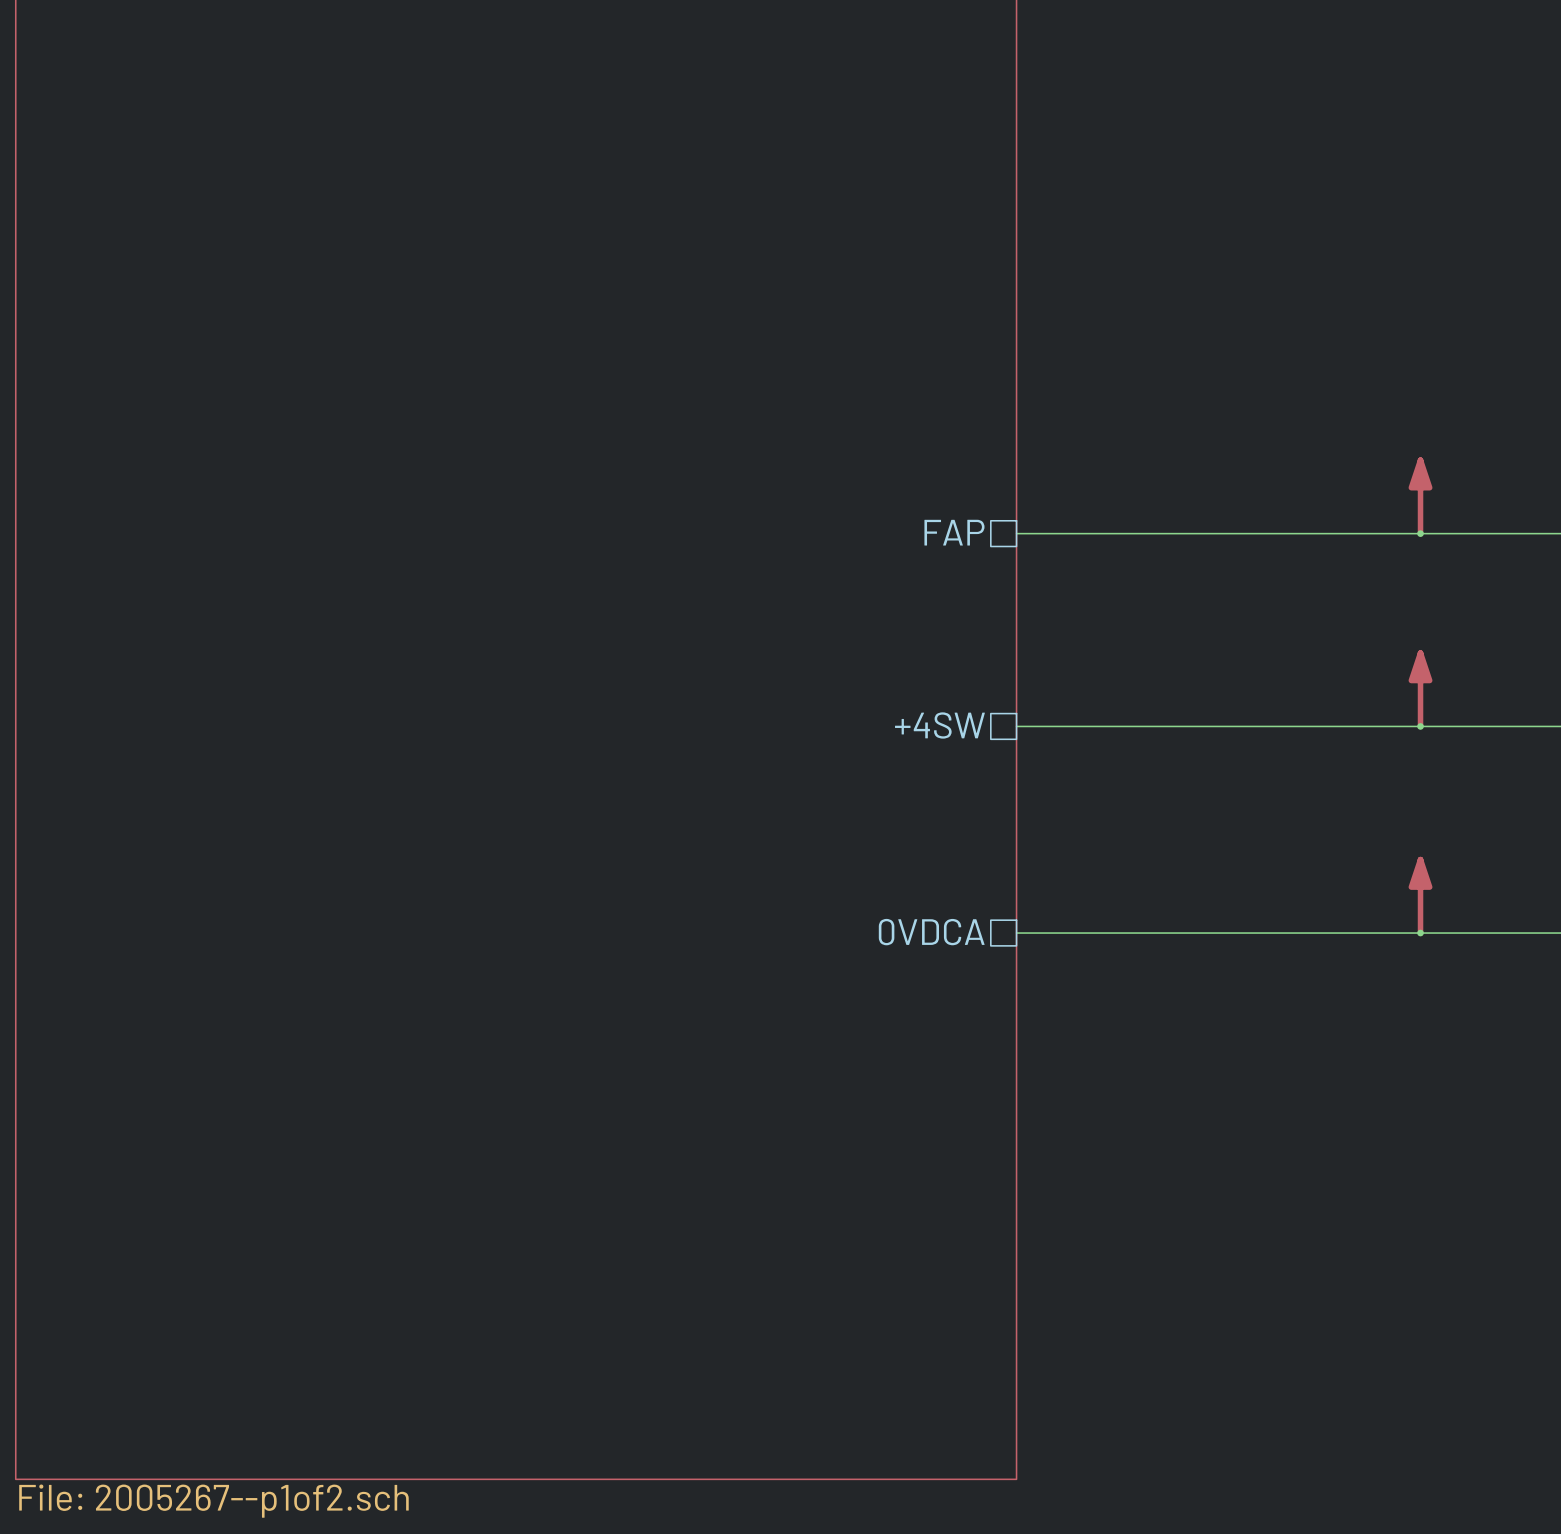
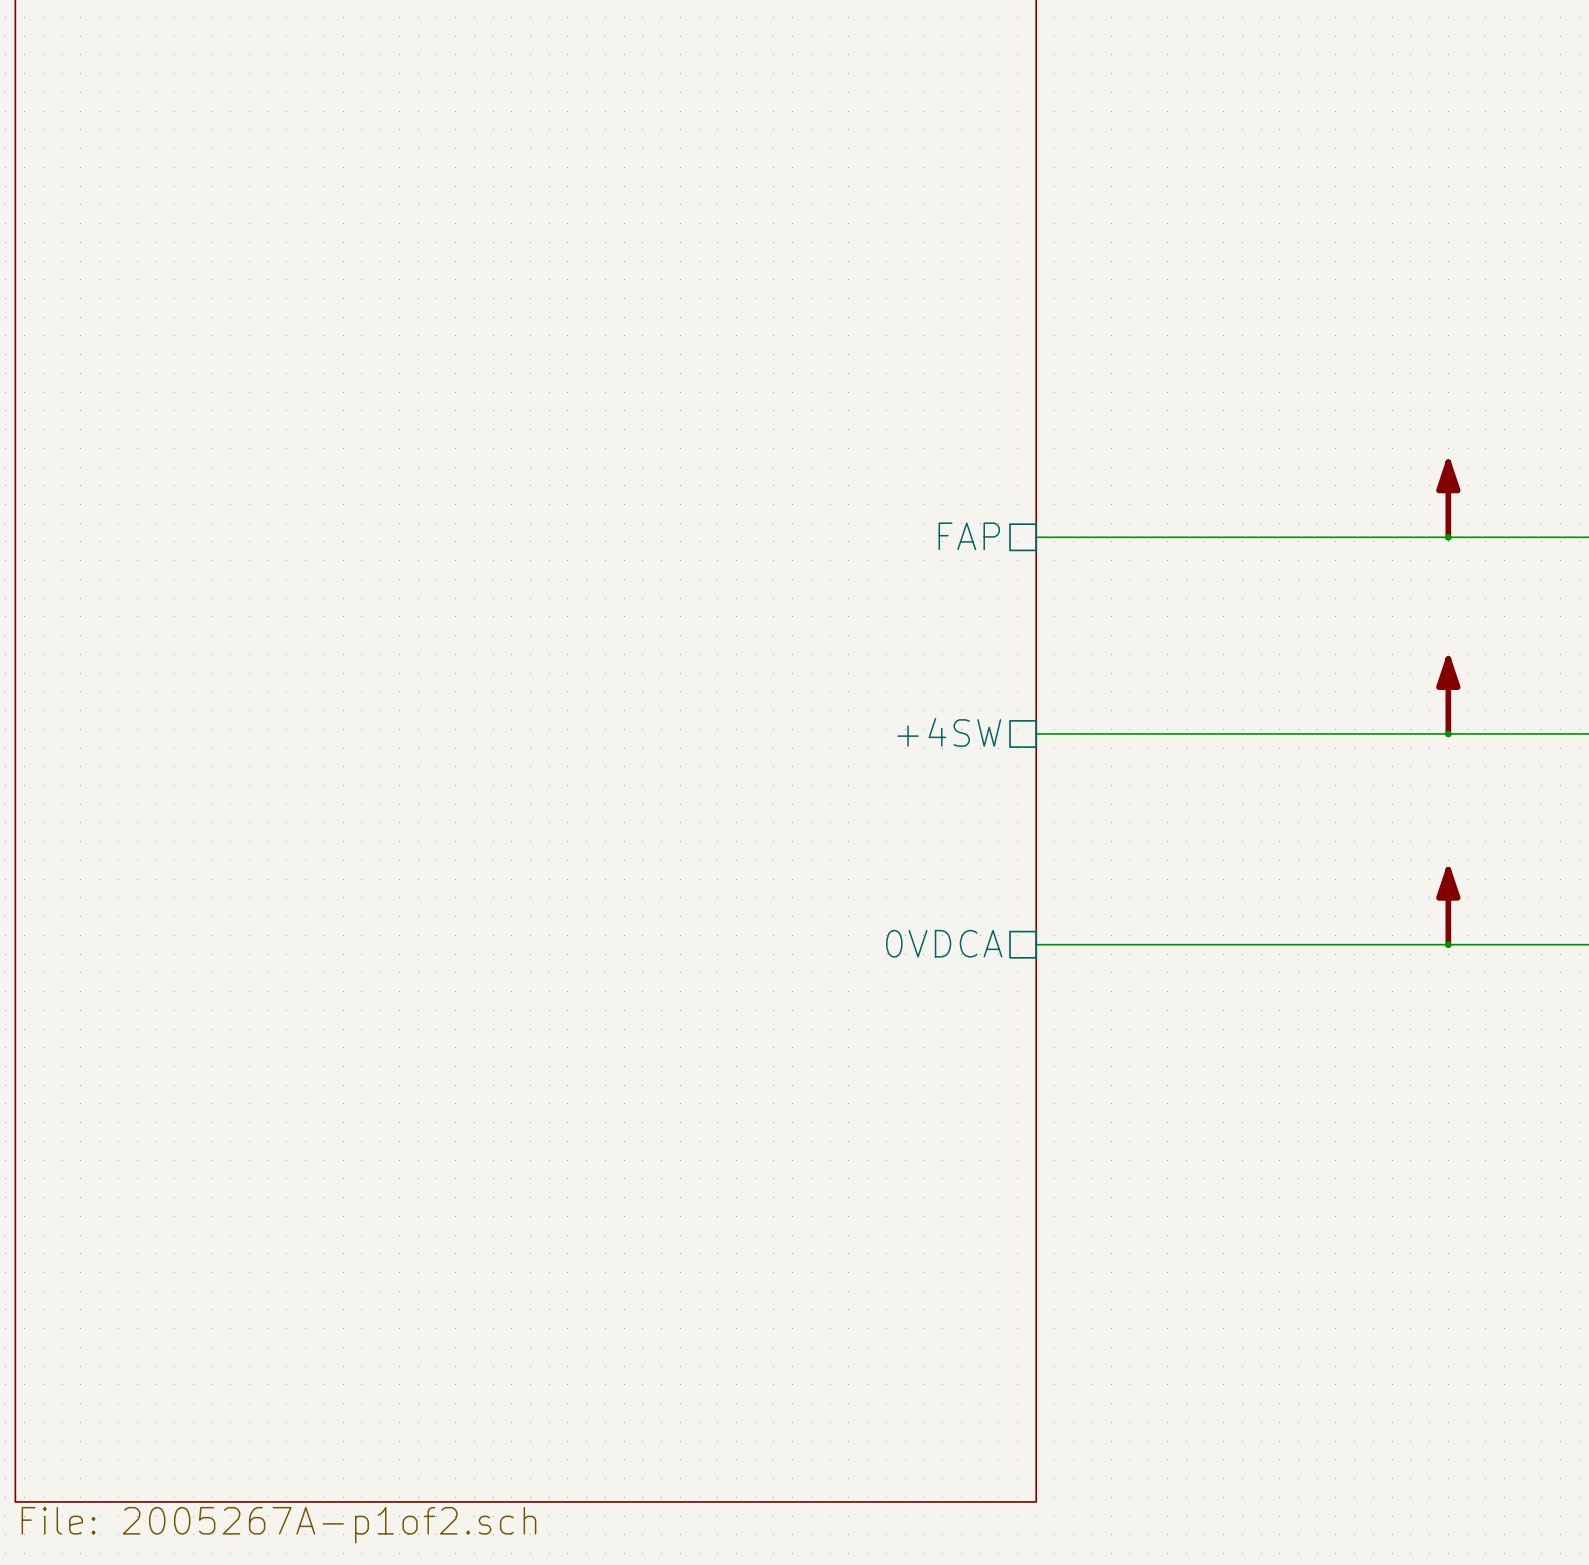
sheet value: File: 2005267--p1of2.sch (213, 1501) -> File: 2005267A-p1of2.sch (278, 1525)

